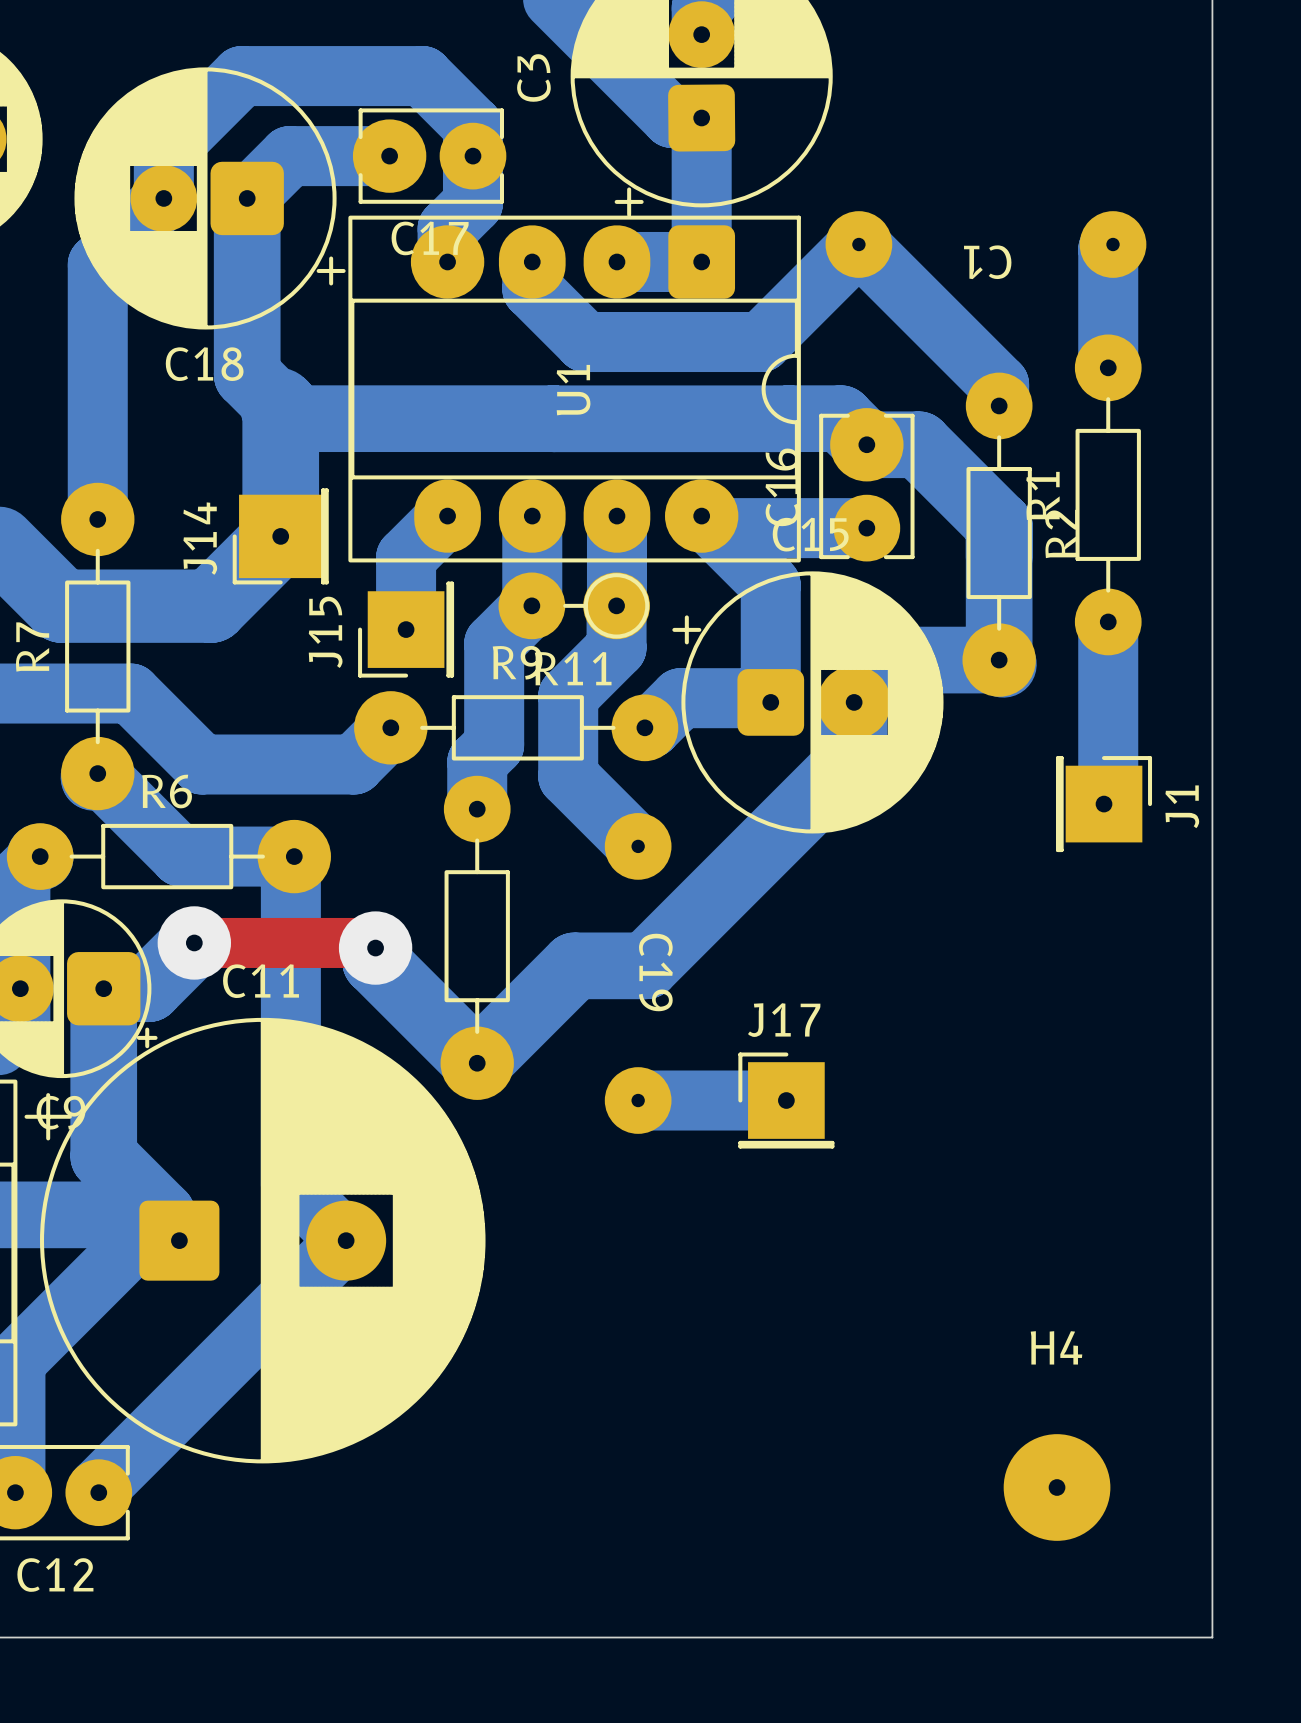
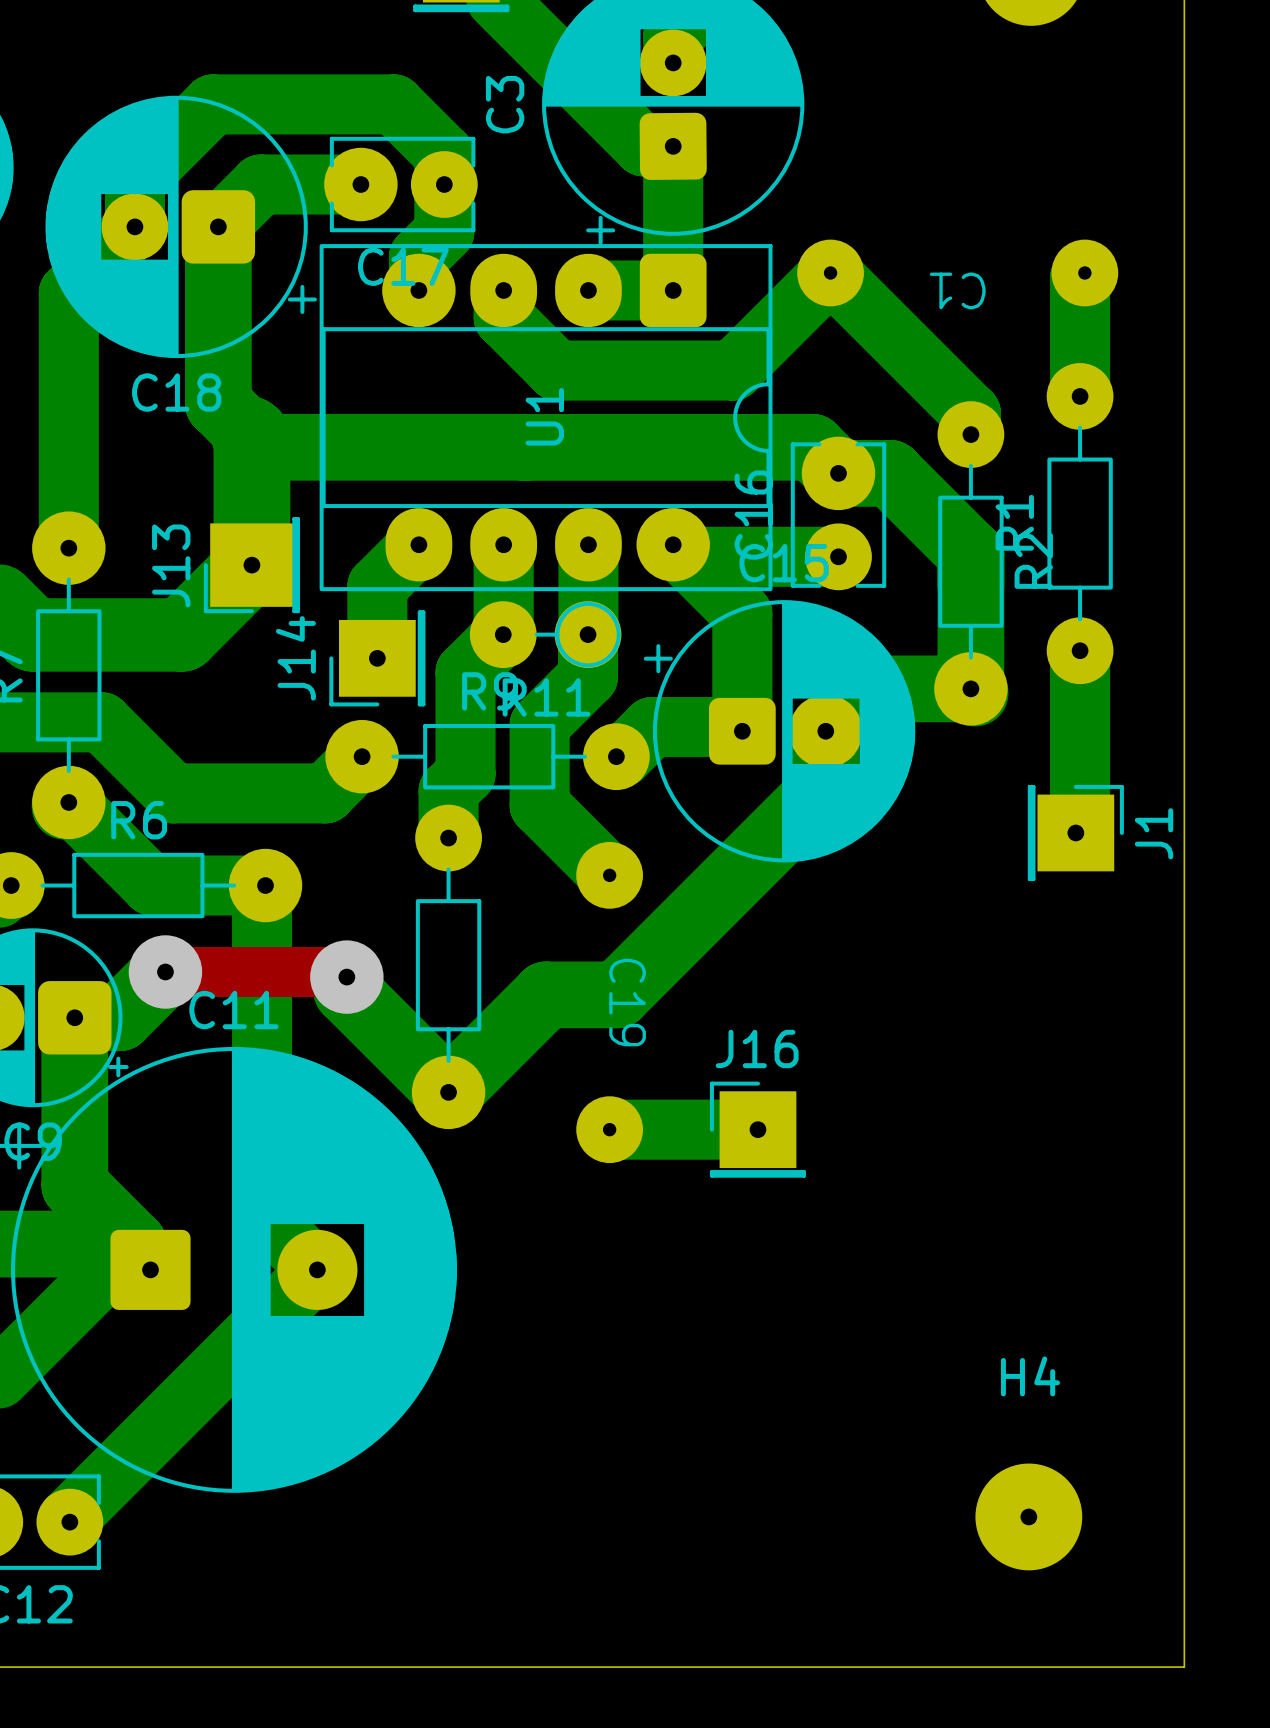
J14 name: J14 (200, 538) -> J13 (171, 565)
J15 name: J15 (325, 632) -> J14 (295, 658)
J17 name: J17 (784, 1020) -> J16 (757, 1048)

